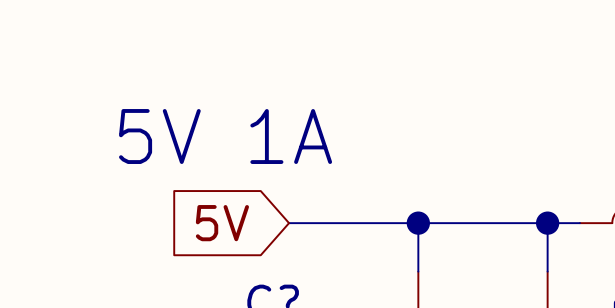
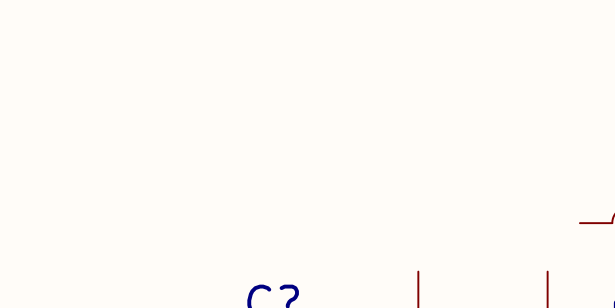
text: 5V 1A (225, 136) -> none
global label: 5V (222, 223) -> none
wire: (289, 223) (579, 223) -> none
wire: (418, 223) (418, 271) -> none
junction: (418, 223) -> none
wire: (547, 223) (547, 271) -> none
junction: (547, 223) -> none

